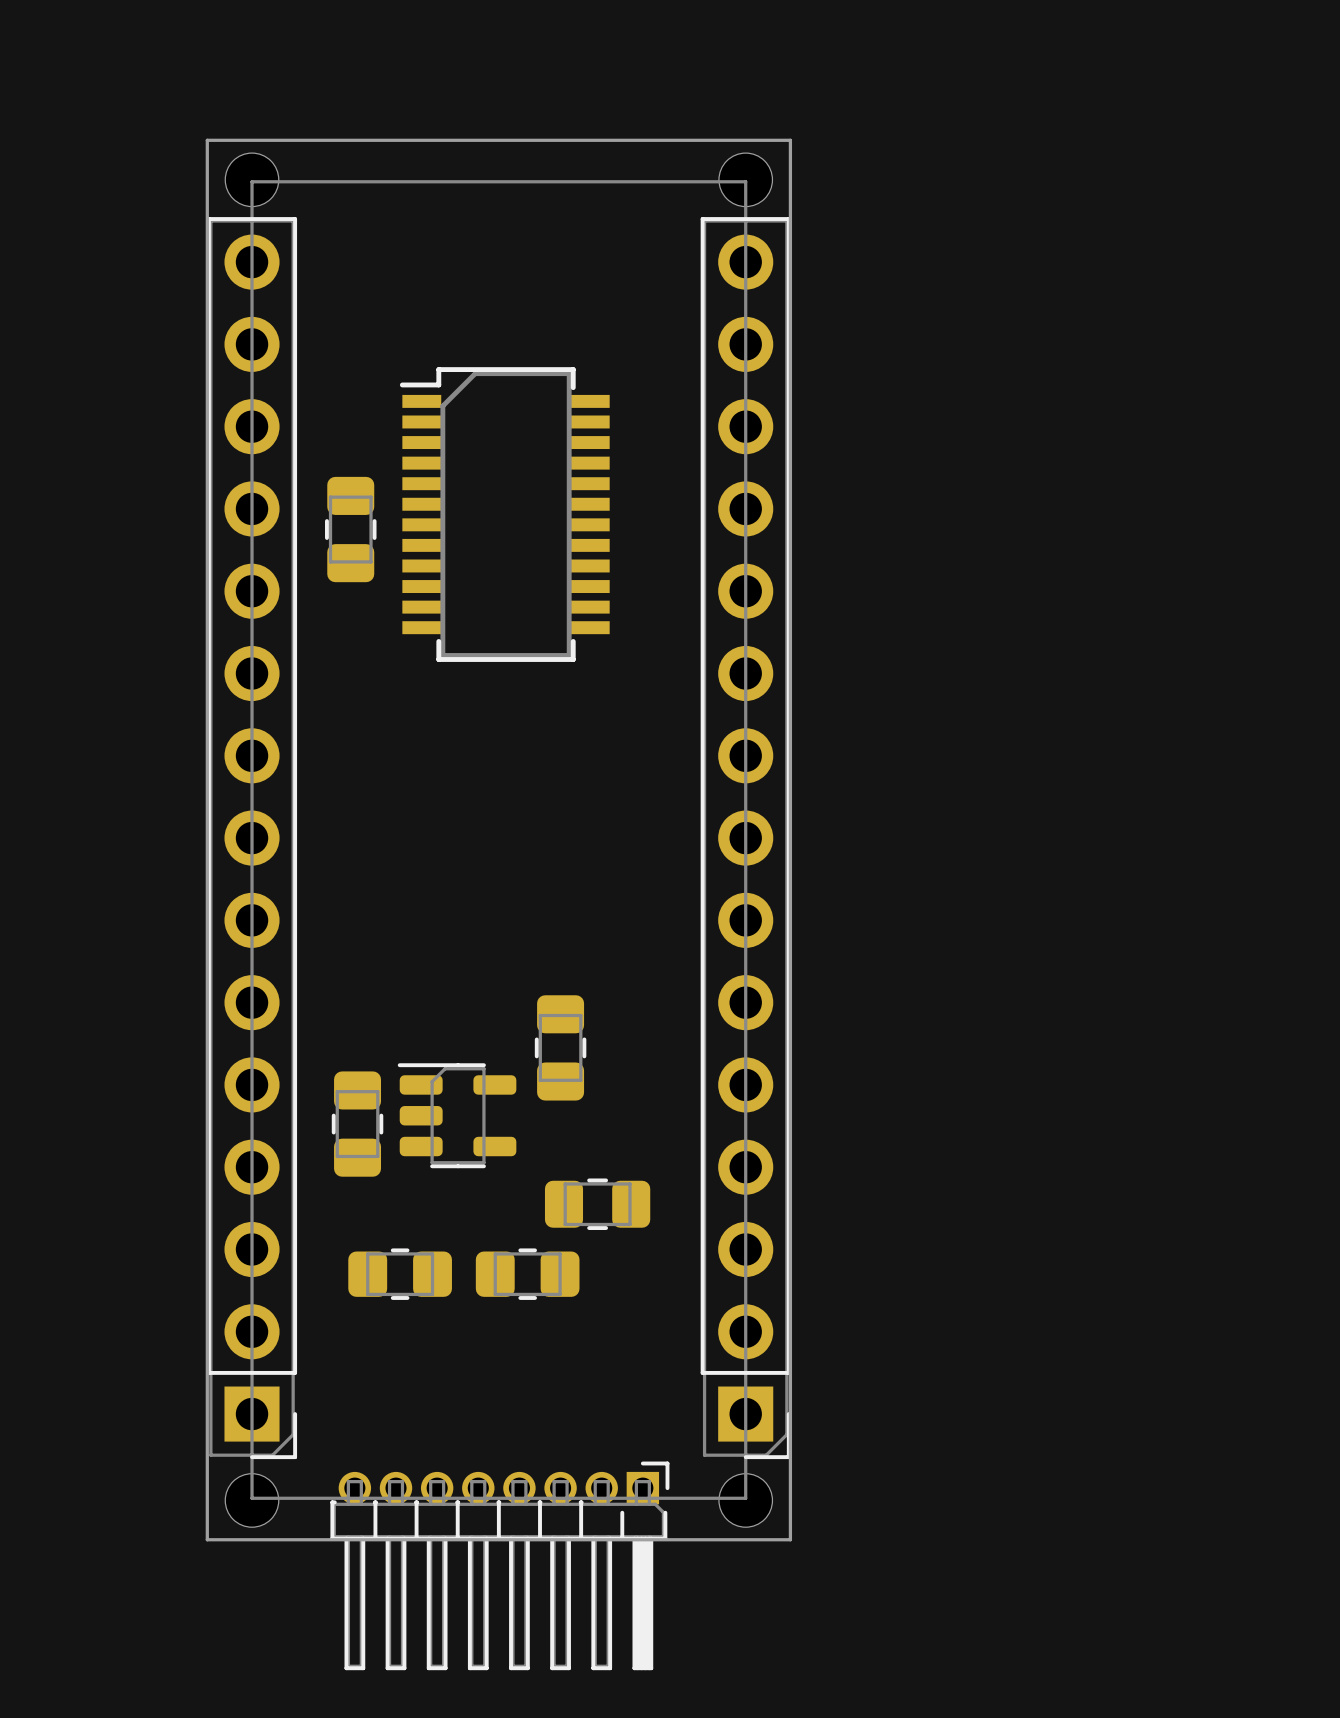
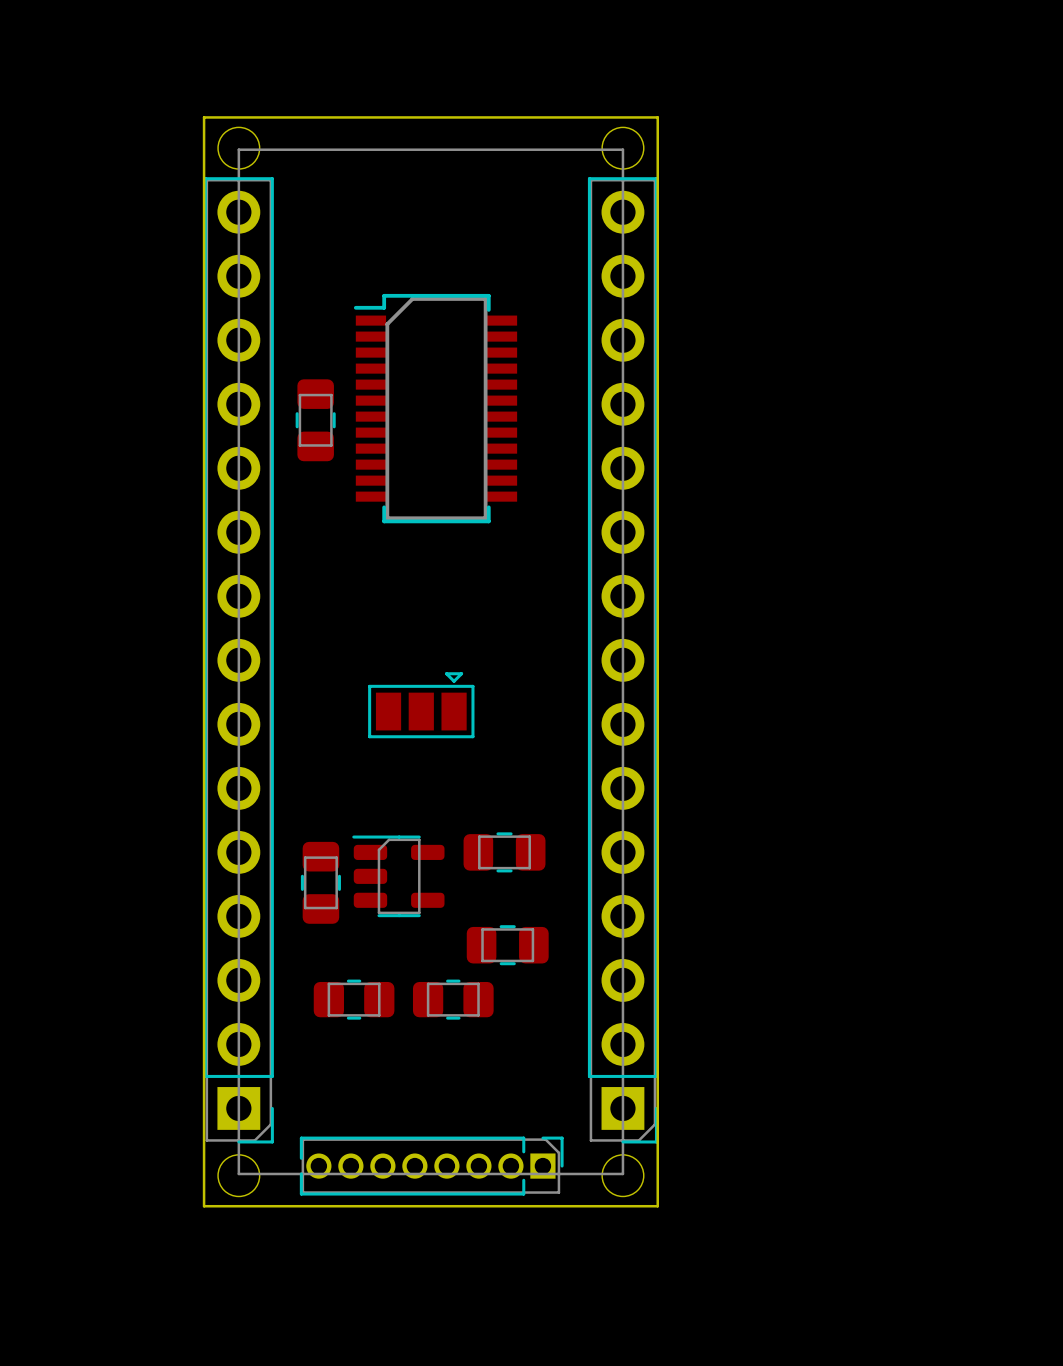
part: none -> (421, 705)
part rotation: 0° (560, 1047) -> 90° clockwise (504, 852)
part: none -> (431, 1166)
part: (499, 1565) -> none

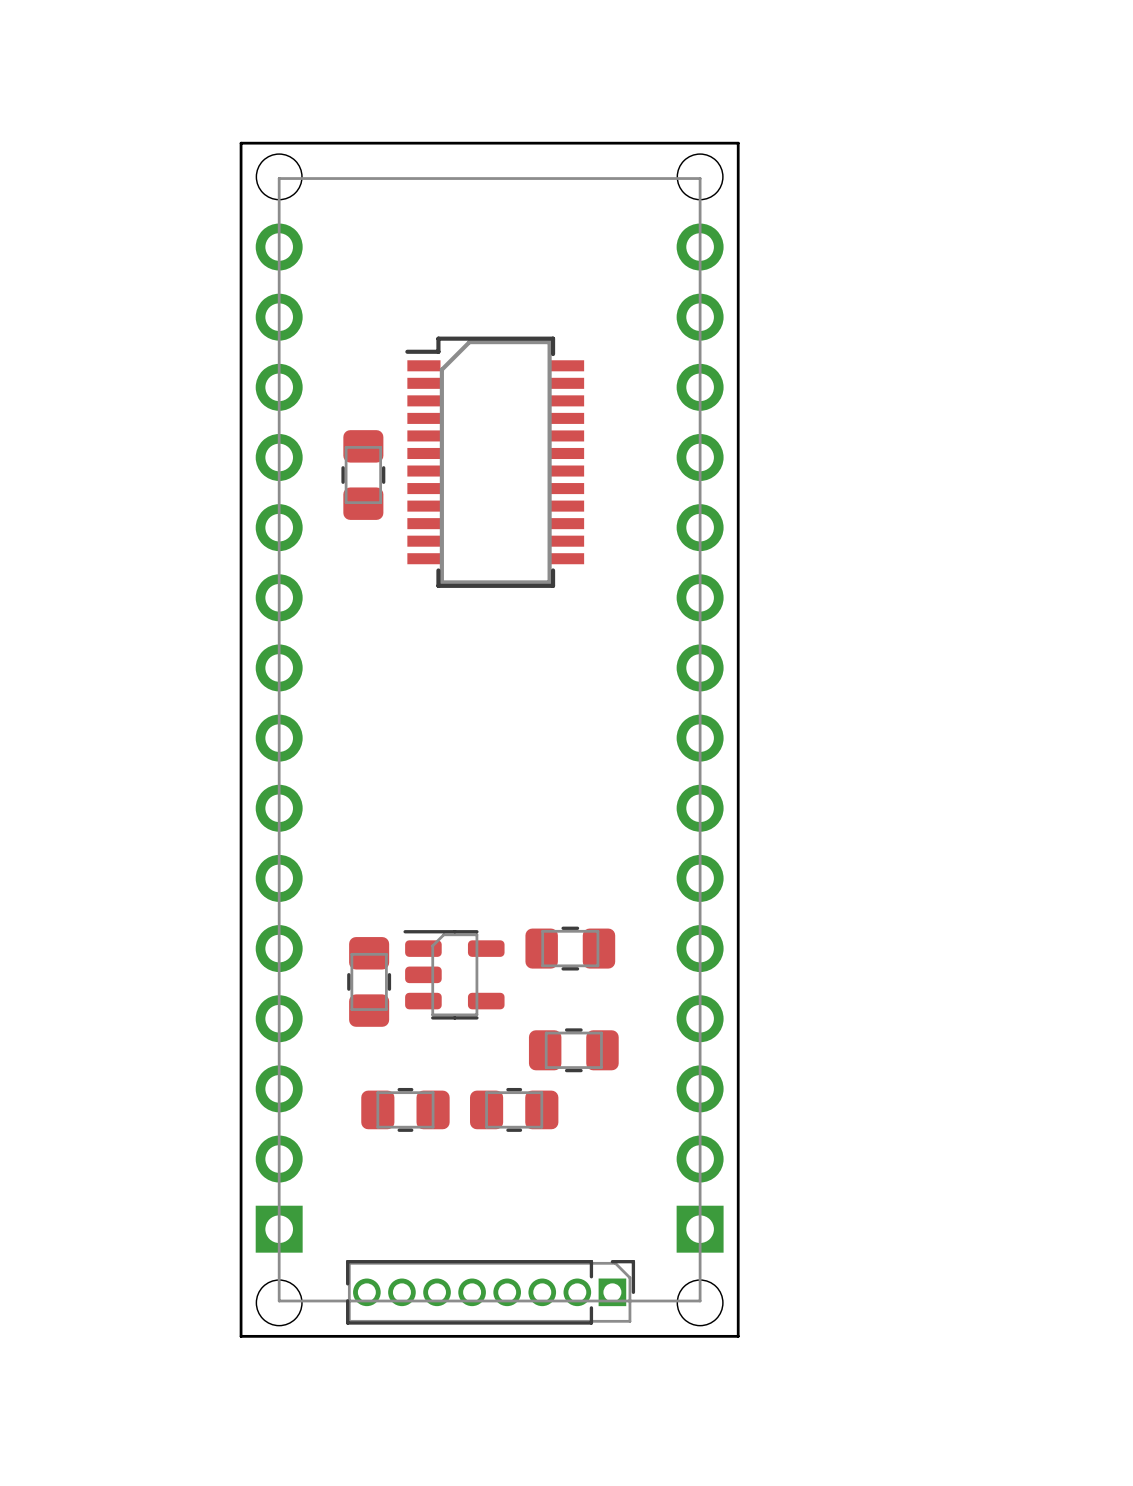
part side: top (238, 660) -> bottom (279, 738)
part side: top (622, 660) -> bottom (700, 738)
part: (421, 705) -> none

